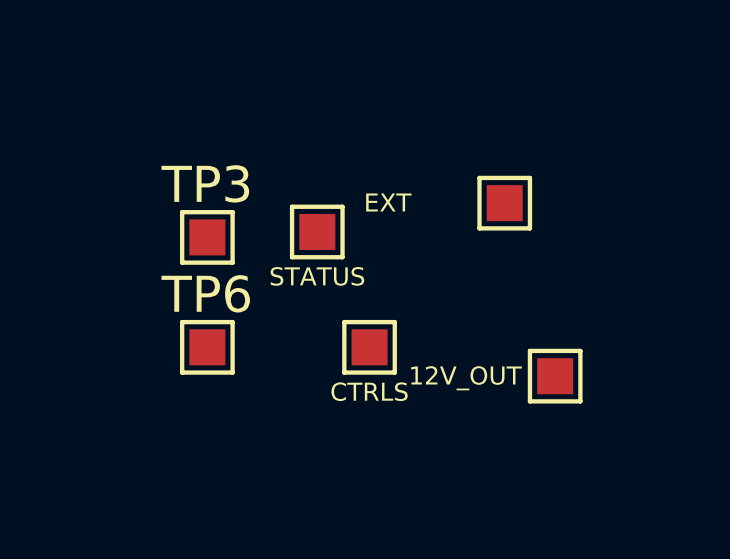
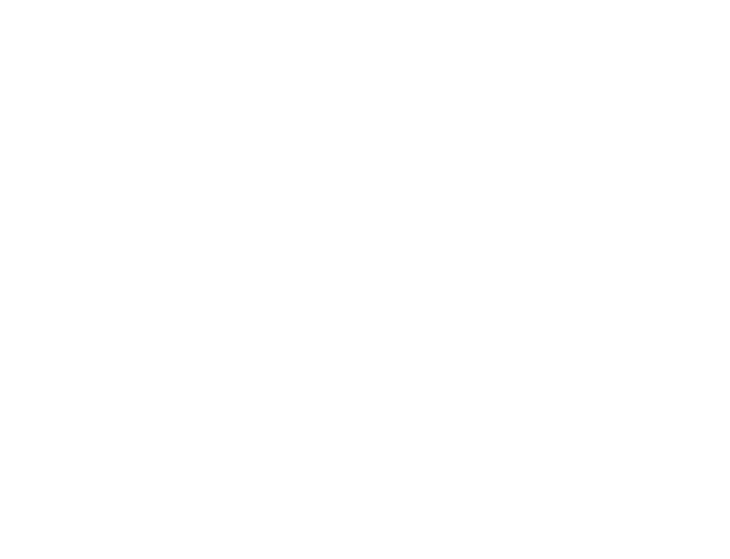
part: EXT (504, 203) -> none
part: STATUS (317, 231) -> none
TP3: (207, 237) -> none
TP6: (207, 347) -> none
part: CTRLS (369, 347) -> none
part: 12V_OUT (555, 376) -> none

